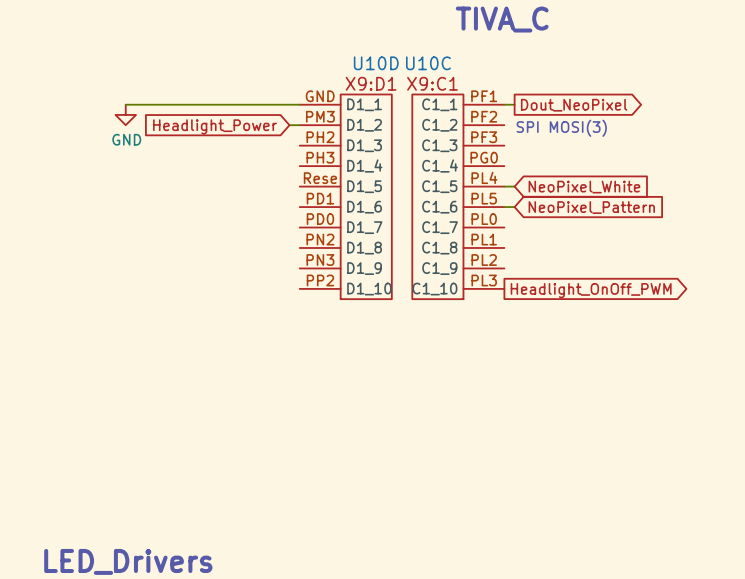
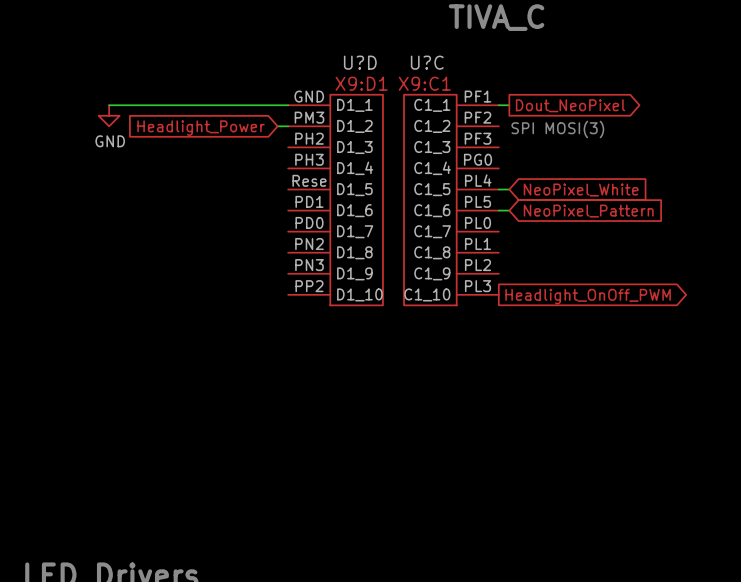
U10D name: U10D (376, 63) -> U?D (360, 62)
U10C name: U10C (428, 63) -> U?C (427, 62)

